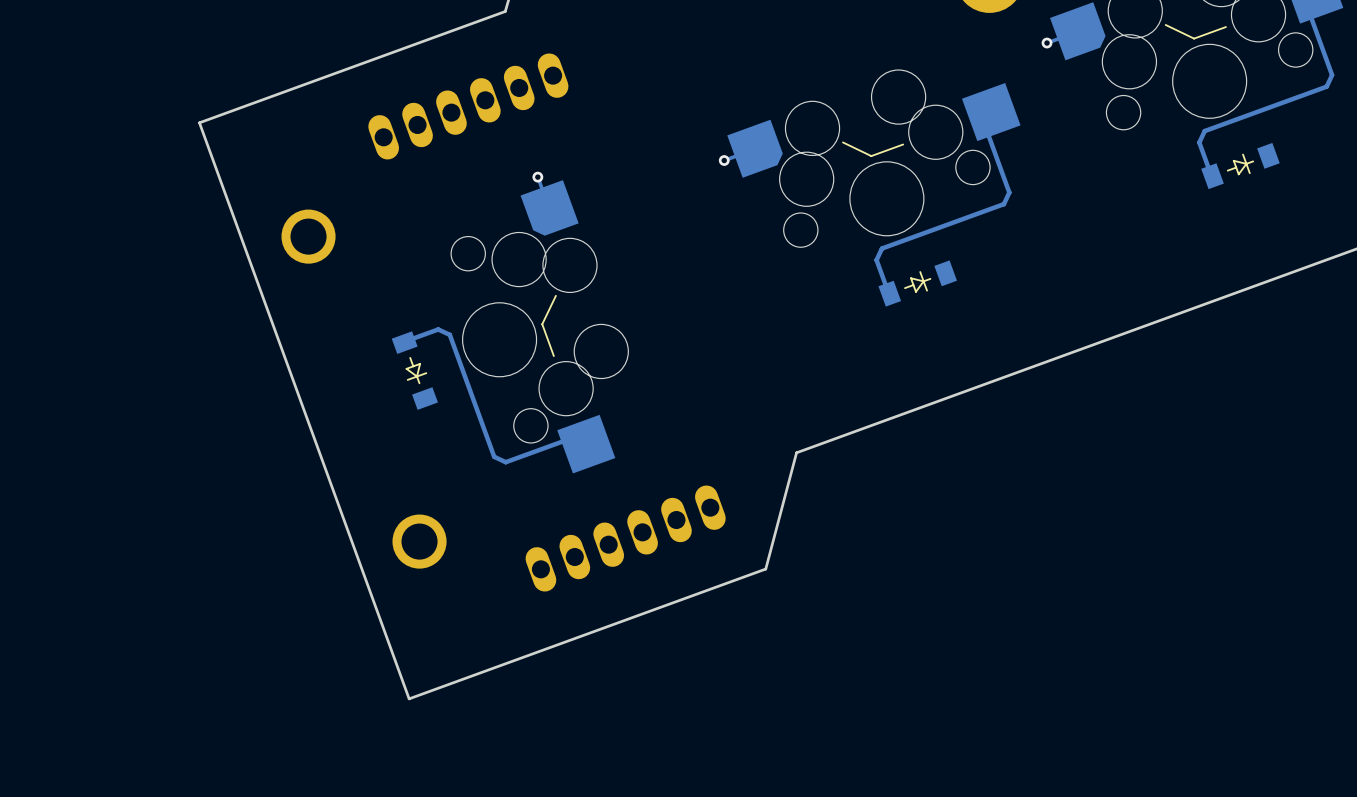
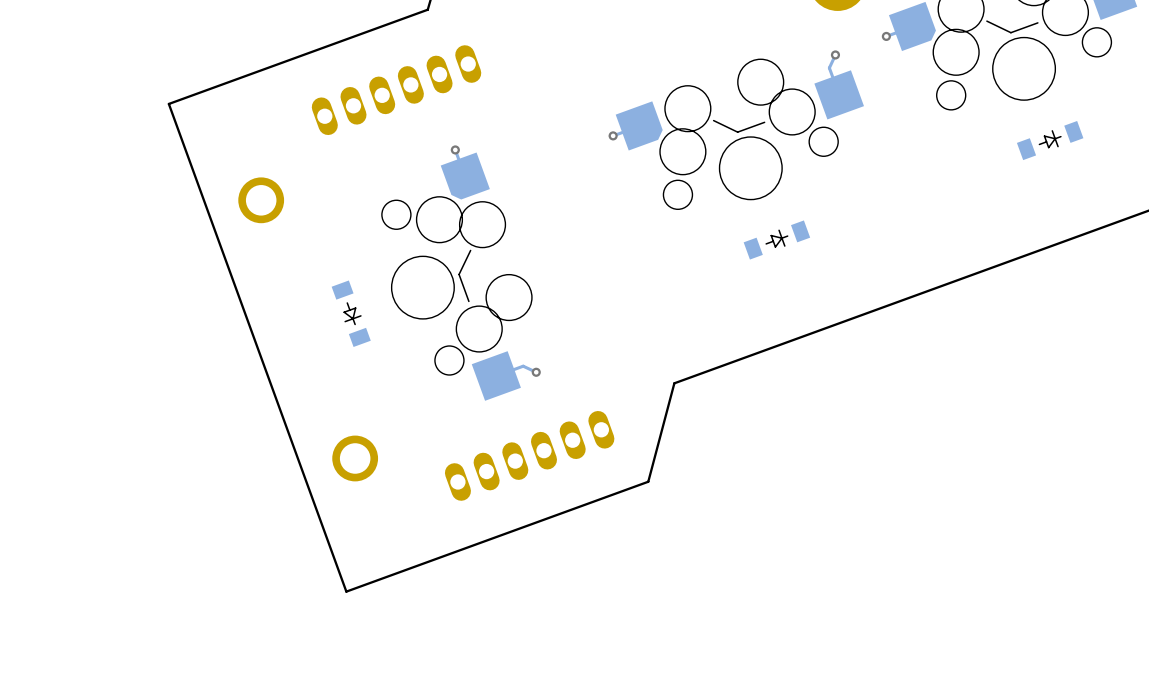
track: (1307, 7) (1332, 75) (1326, 86) (1204, 131) (1199, 142) (1211, 176) -> none
track: none -> (835, 54) (829, 67) (839, 94)
via: none -> (835, 54)
track: (984, 124) (1009, 192) (1003, 204) (881, 248) (876, 260) (888, 293) -> none
track: (404, 341) (438, 329) (449, 334) (494, 456) (505, 462) (573, 437) -> none
track: none -> (536, 372) (523, 366) (496, 375)
via: none -> (536, 372)

